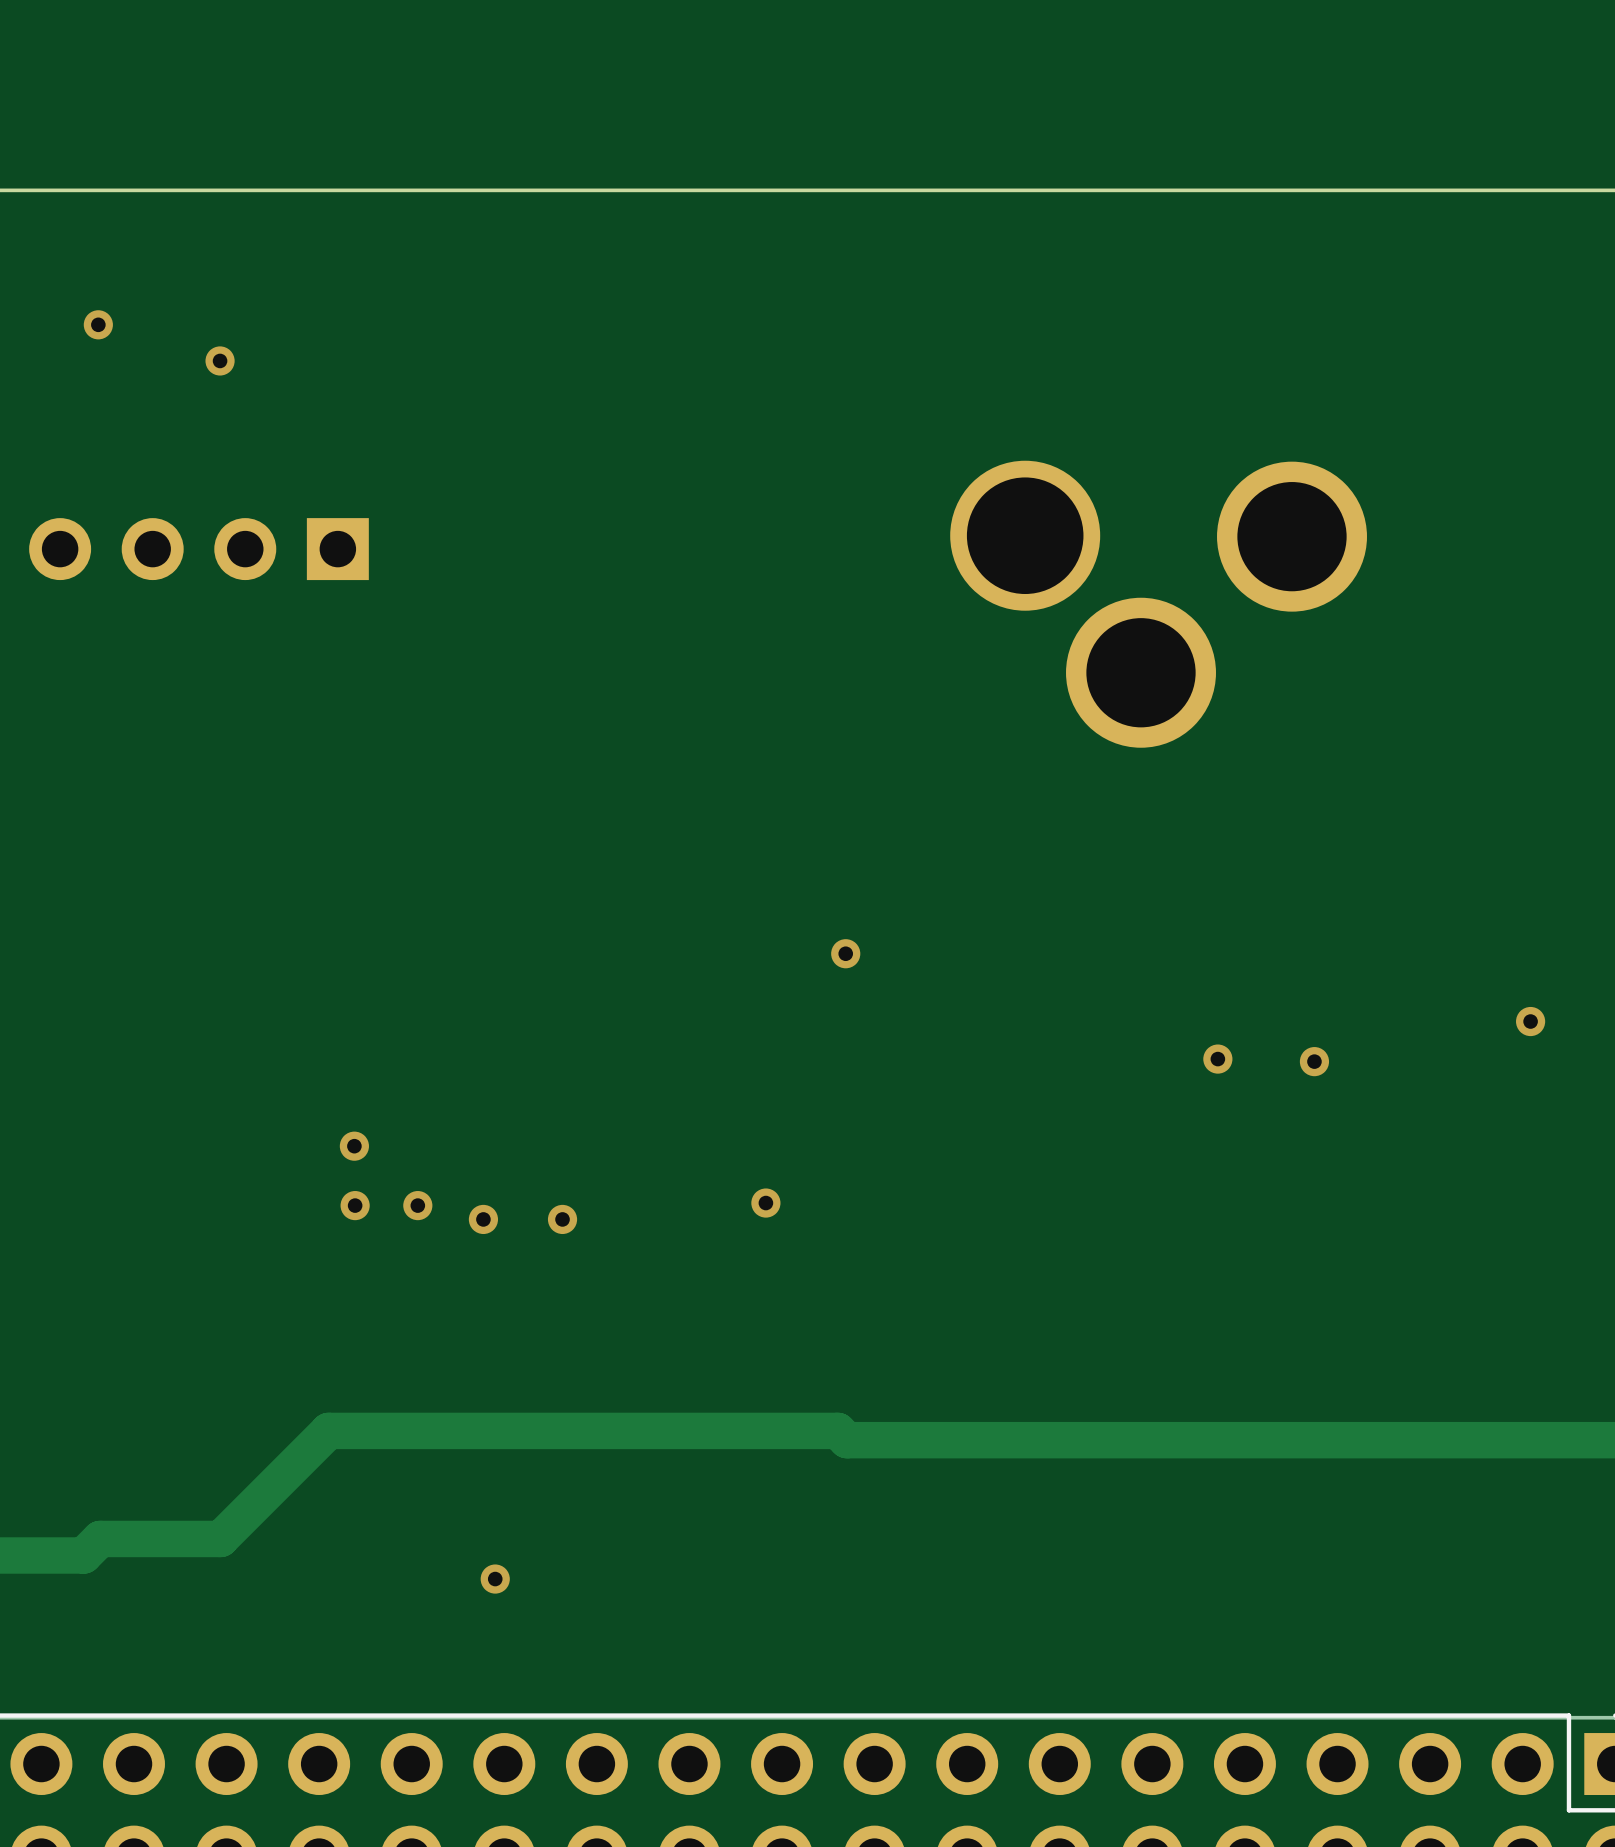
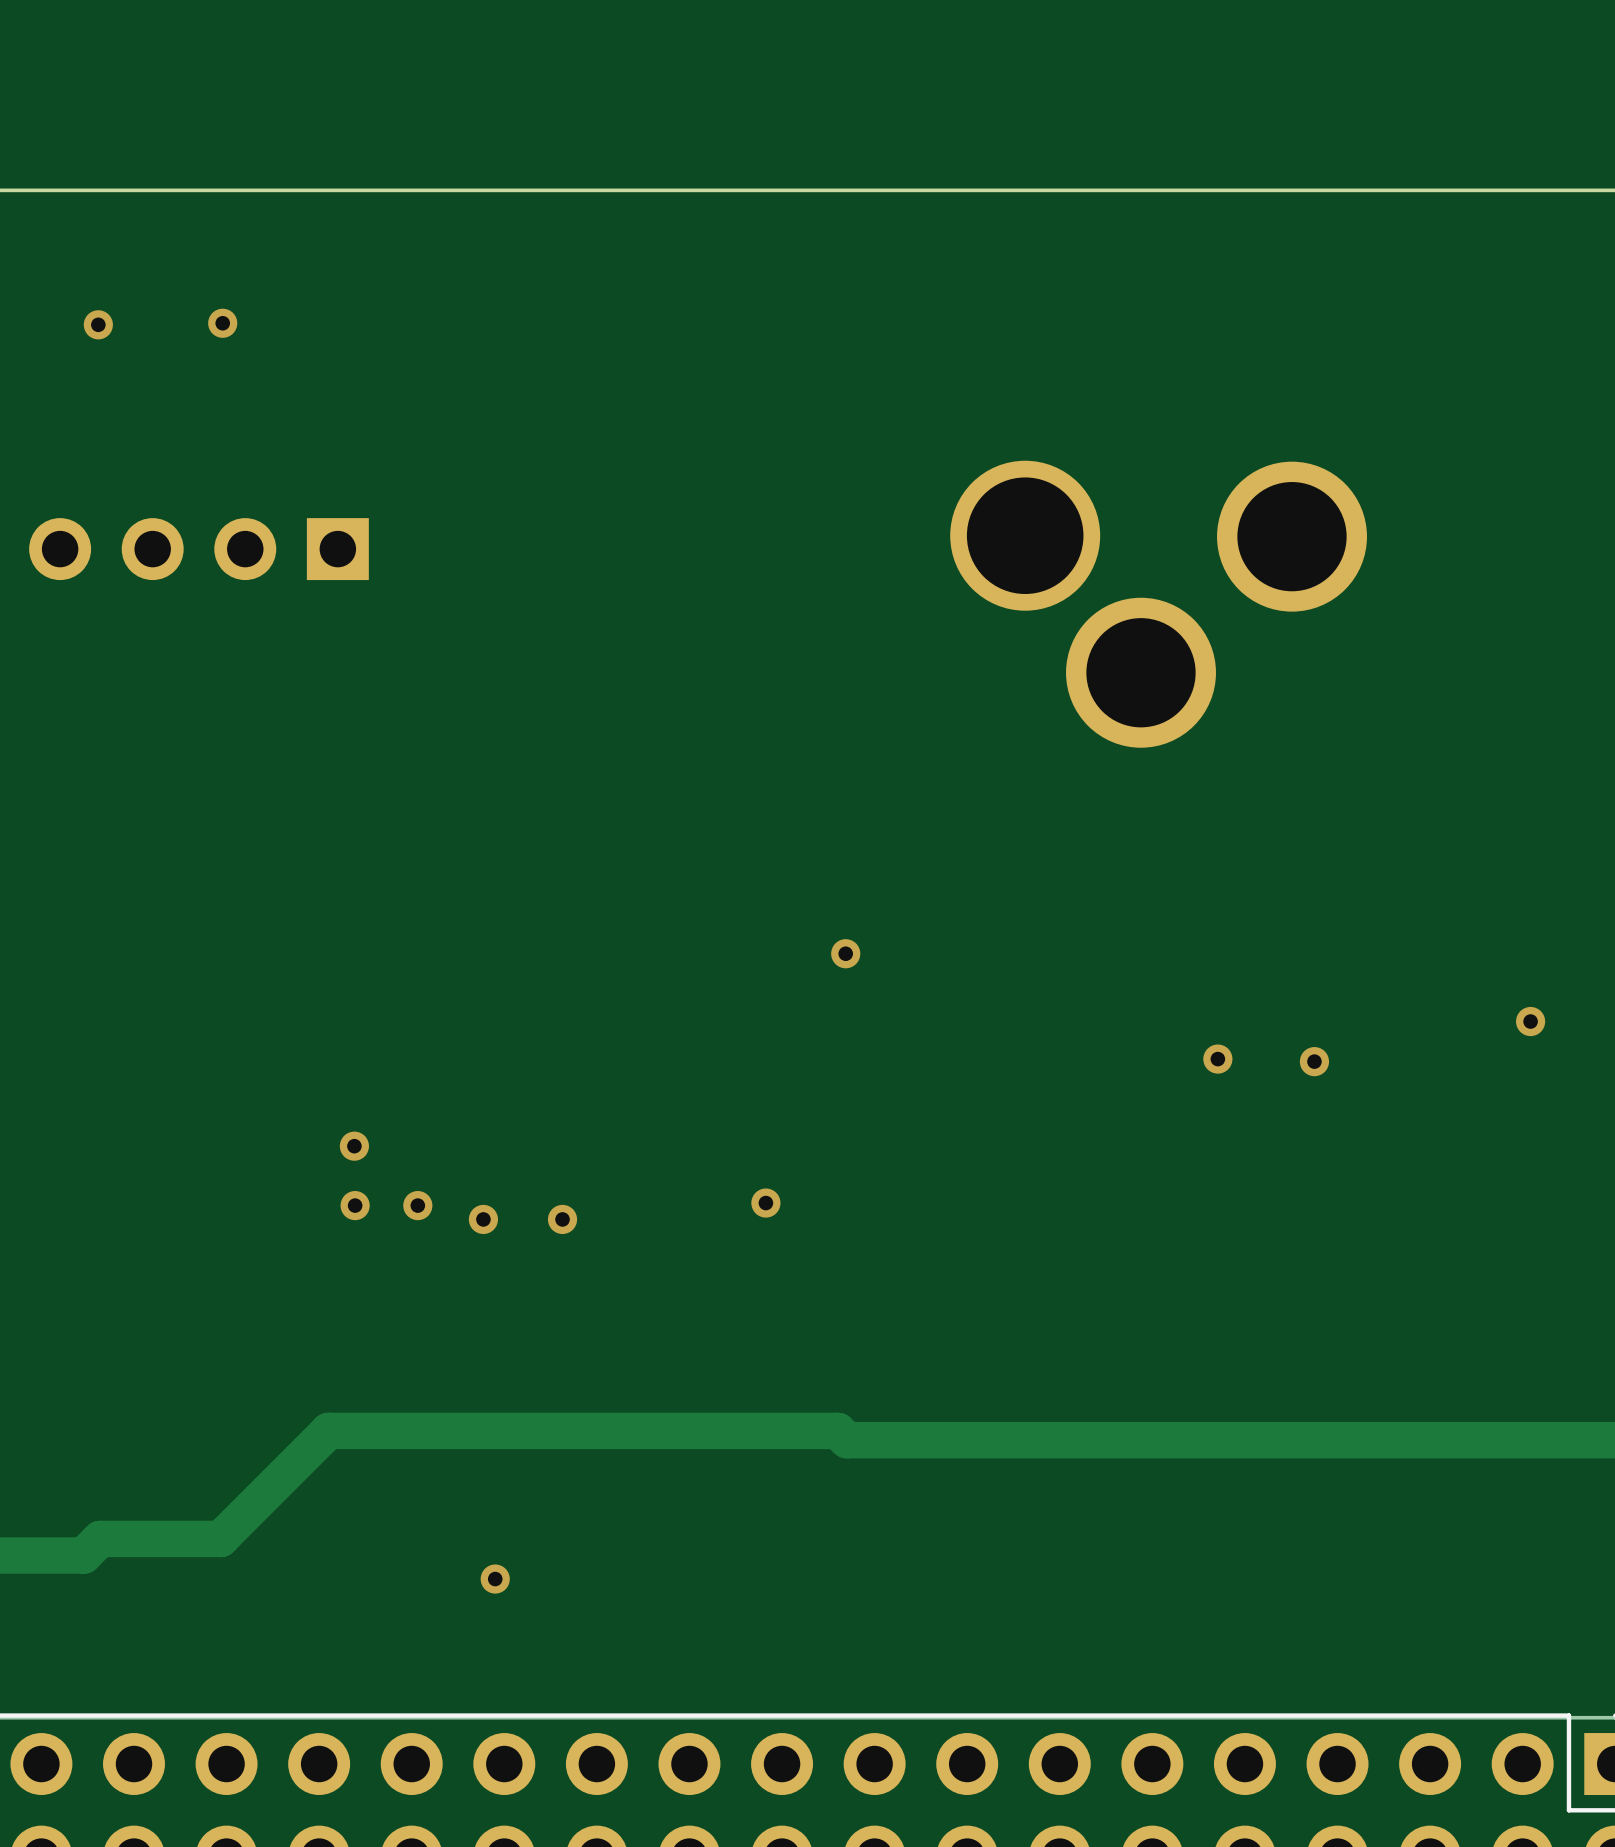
via position: (220, 360) -> (222, 323)

